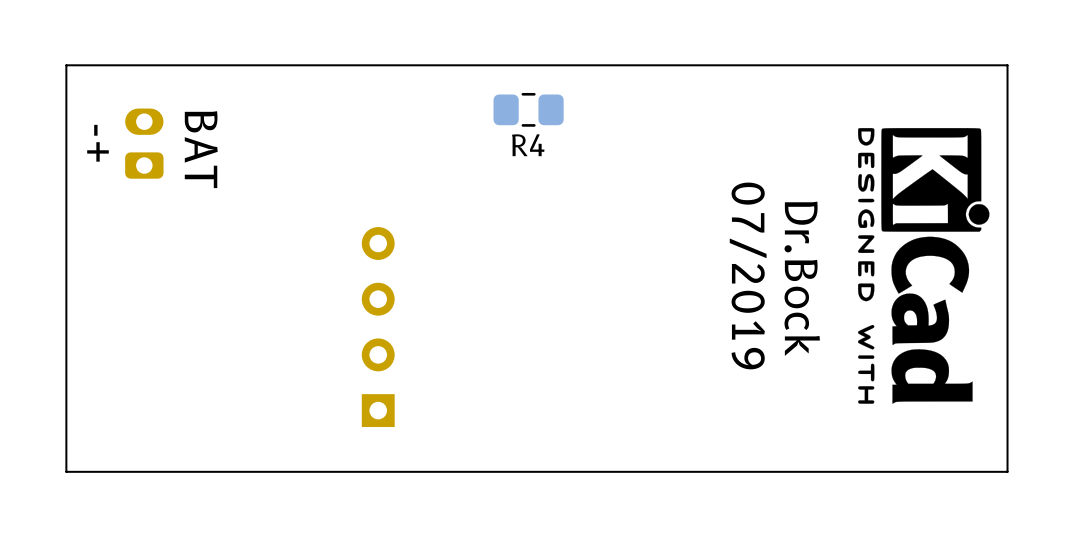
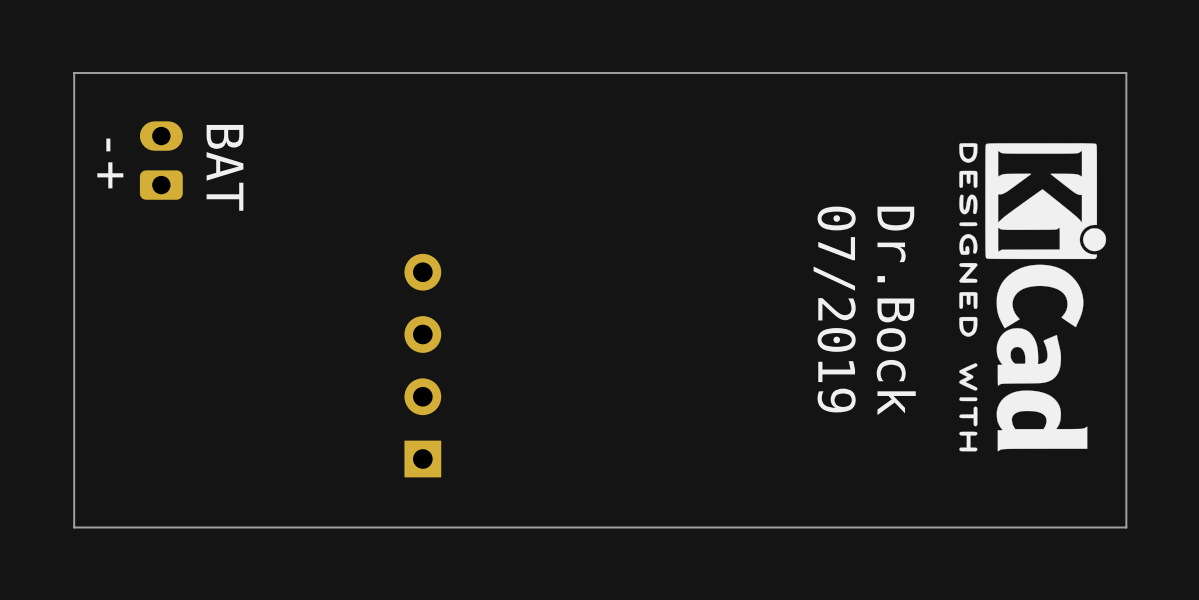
R4: (528, 109) -> none

